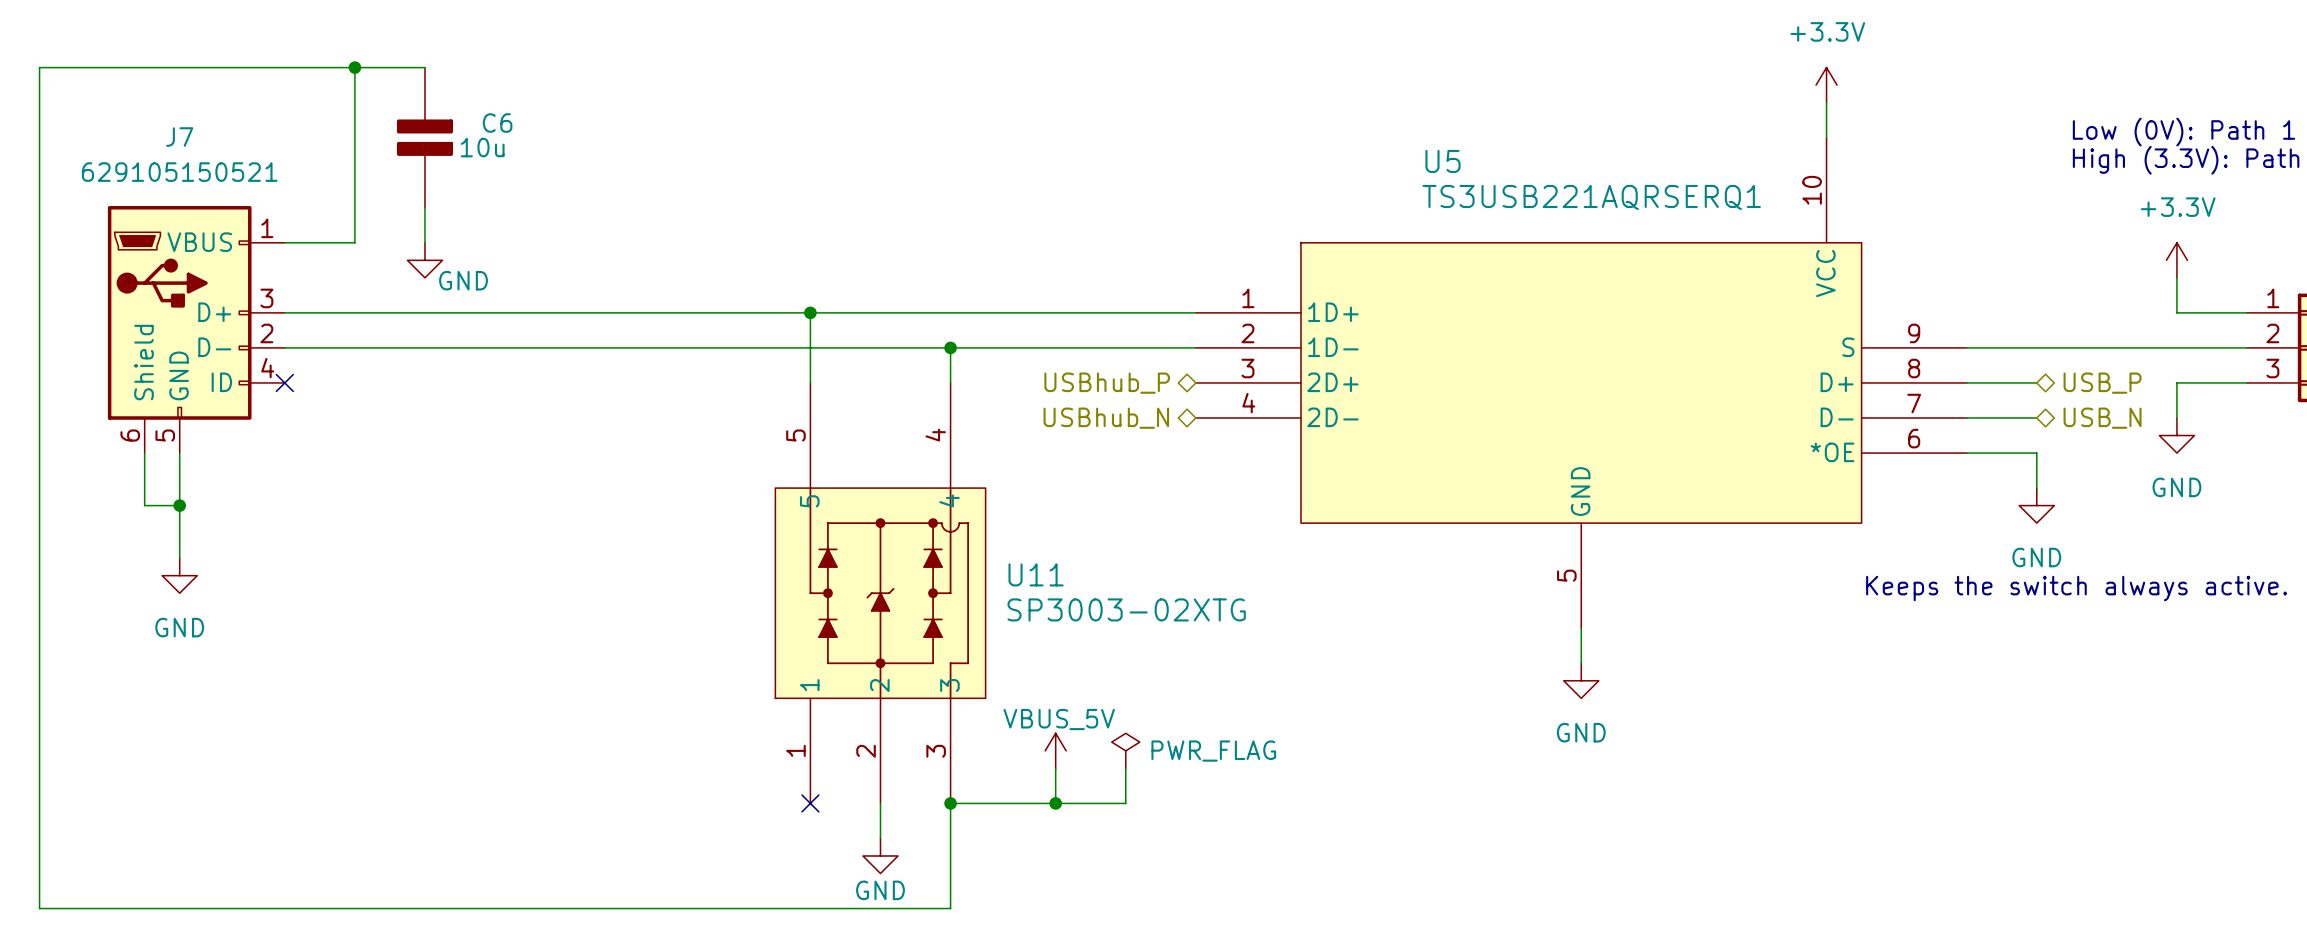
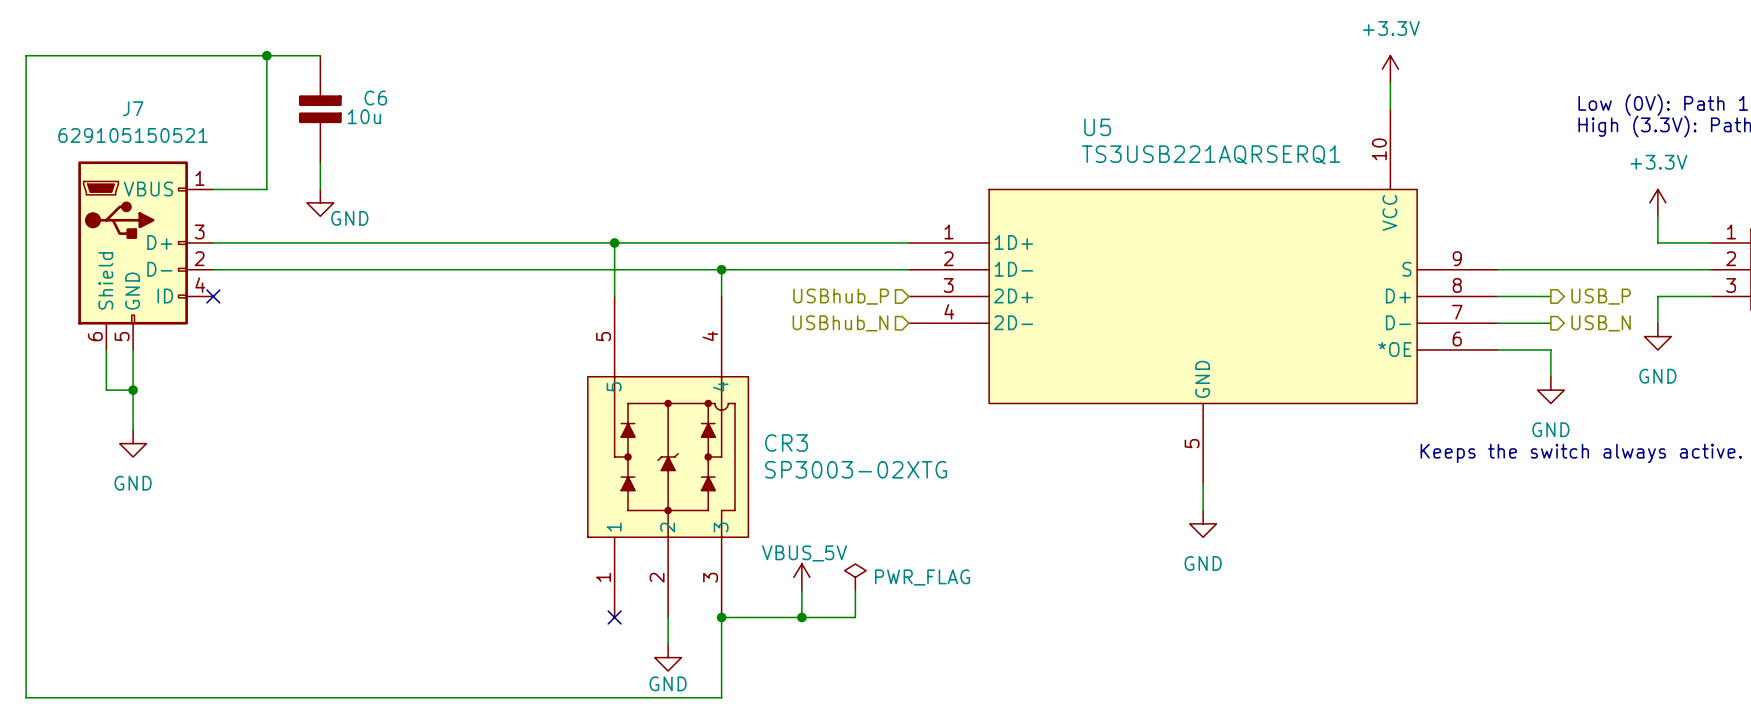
hierarchical label shape: bidirectional (1107, 383) -> input (841, 296)
hierarchical label shape: bidirectional (2102, 383) -> output (1601, 296)
hierarchical label shape: bidirectional (1106, 418) -> input (840, 323)
hierarchical label shape: bidirectional (2102, 418) -> output (1601, 323)
U11 name: U11 (1036, 574) -> CR3 (786, 443)

